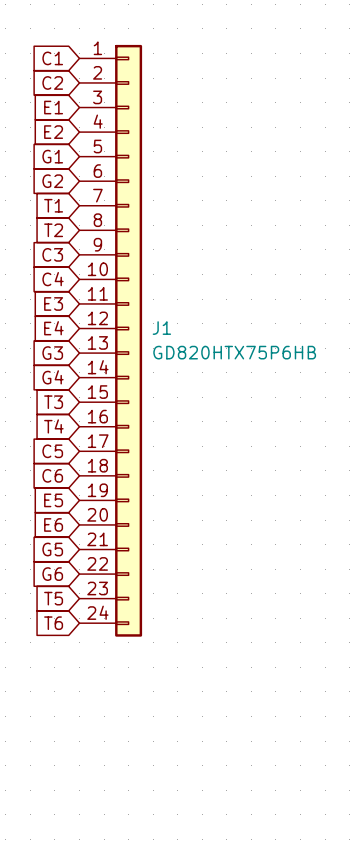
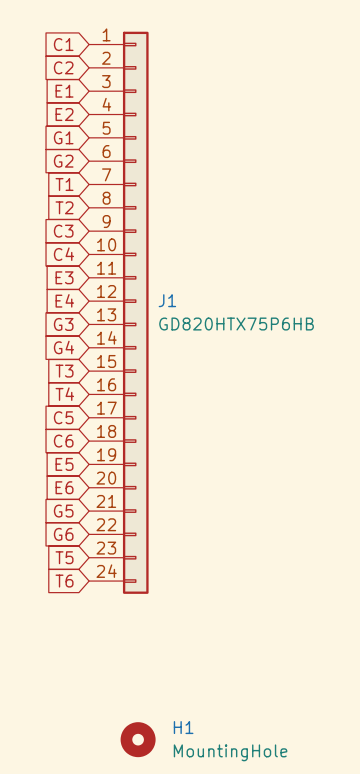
H1: none -> MountingHole (138, 739)

